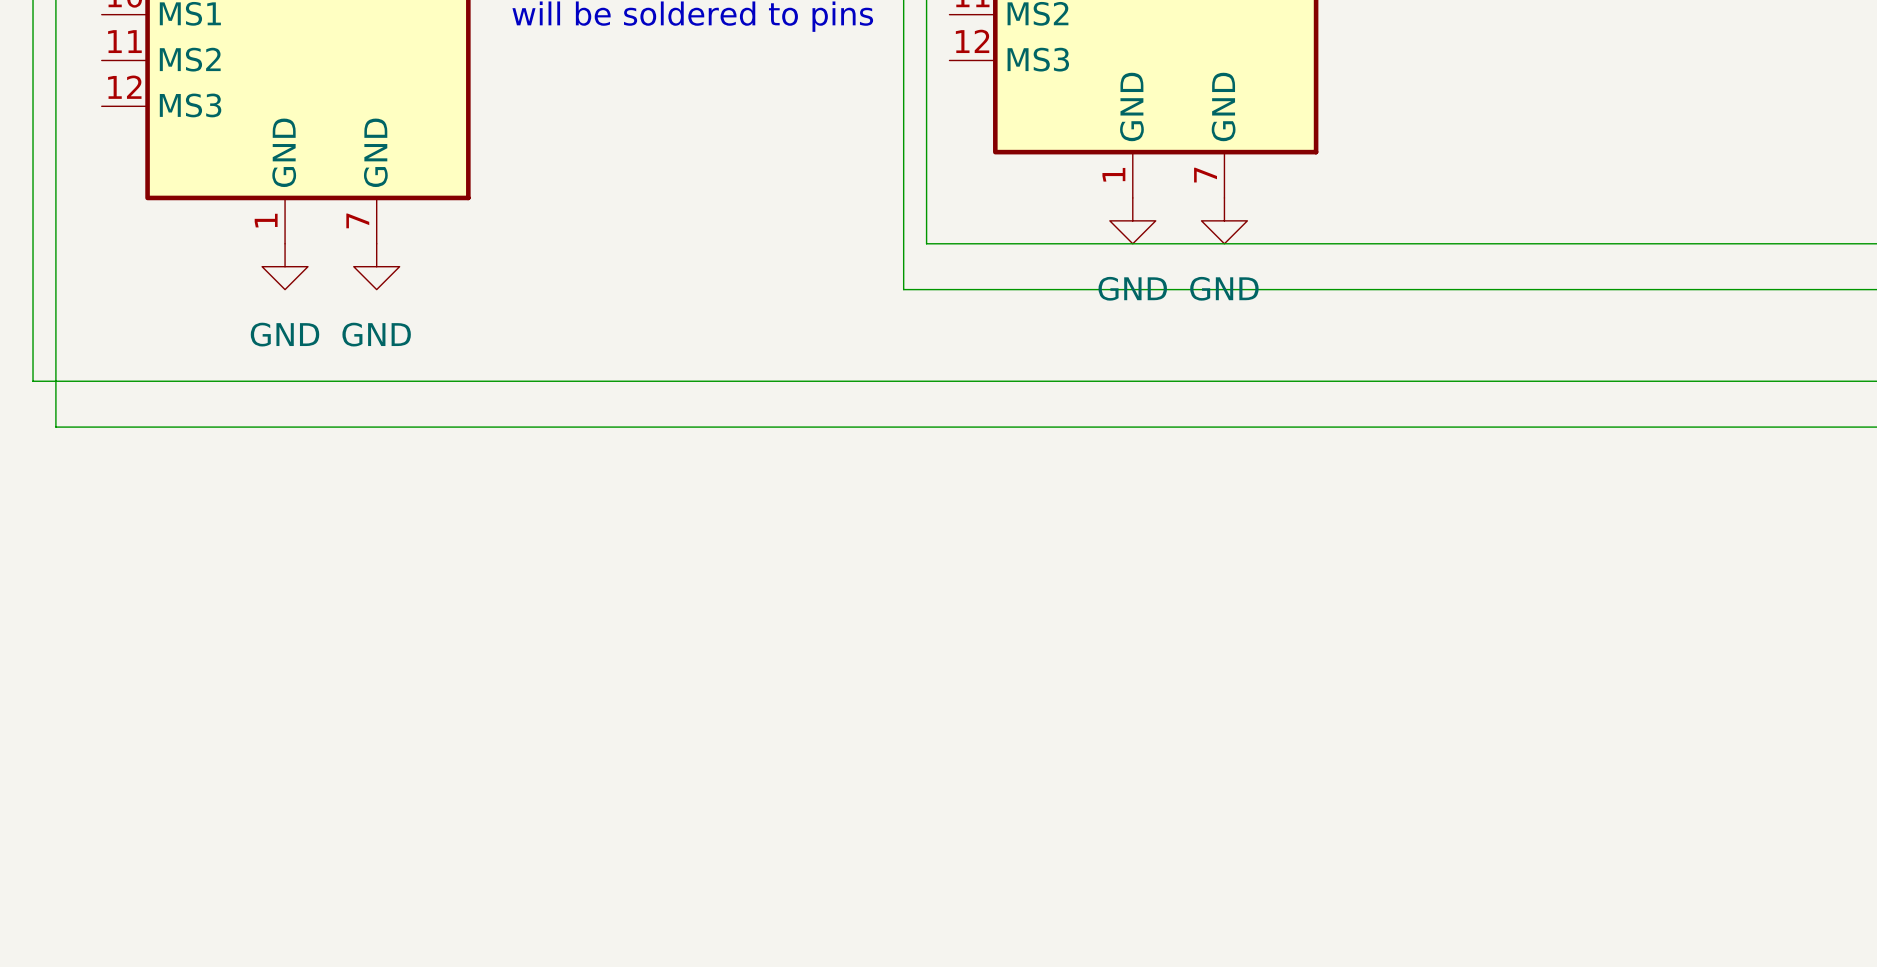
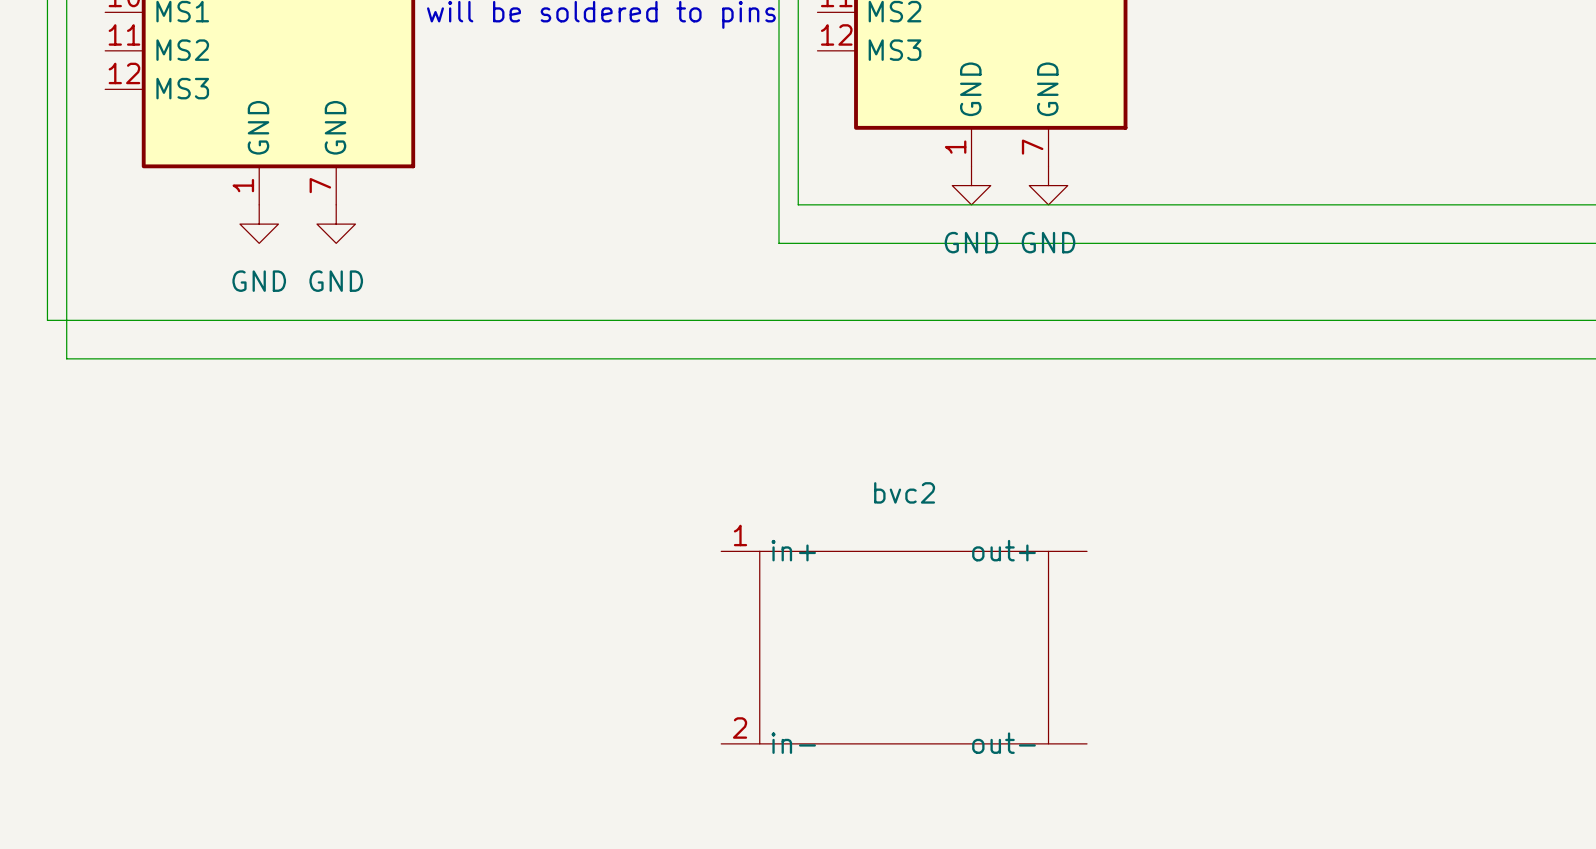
bvc2: none -> (904, 647)

